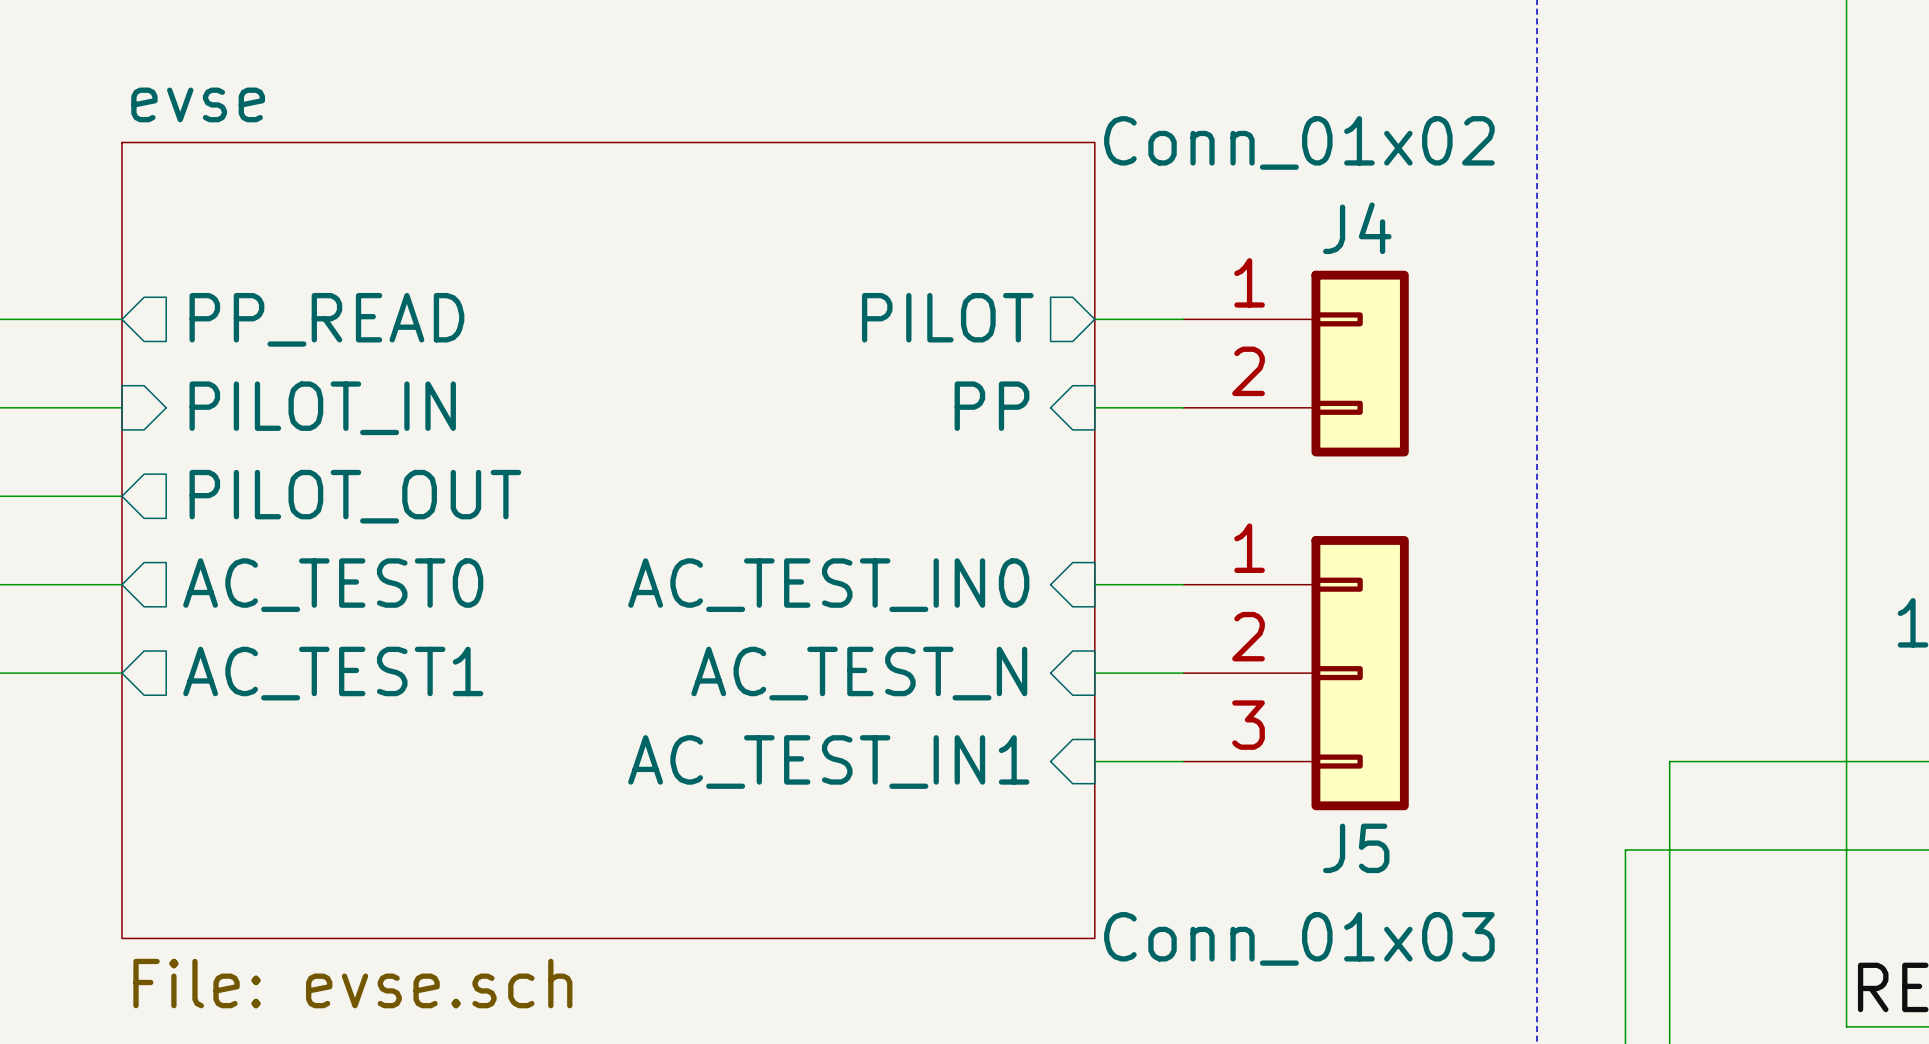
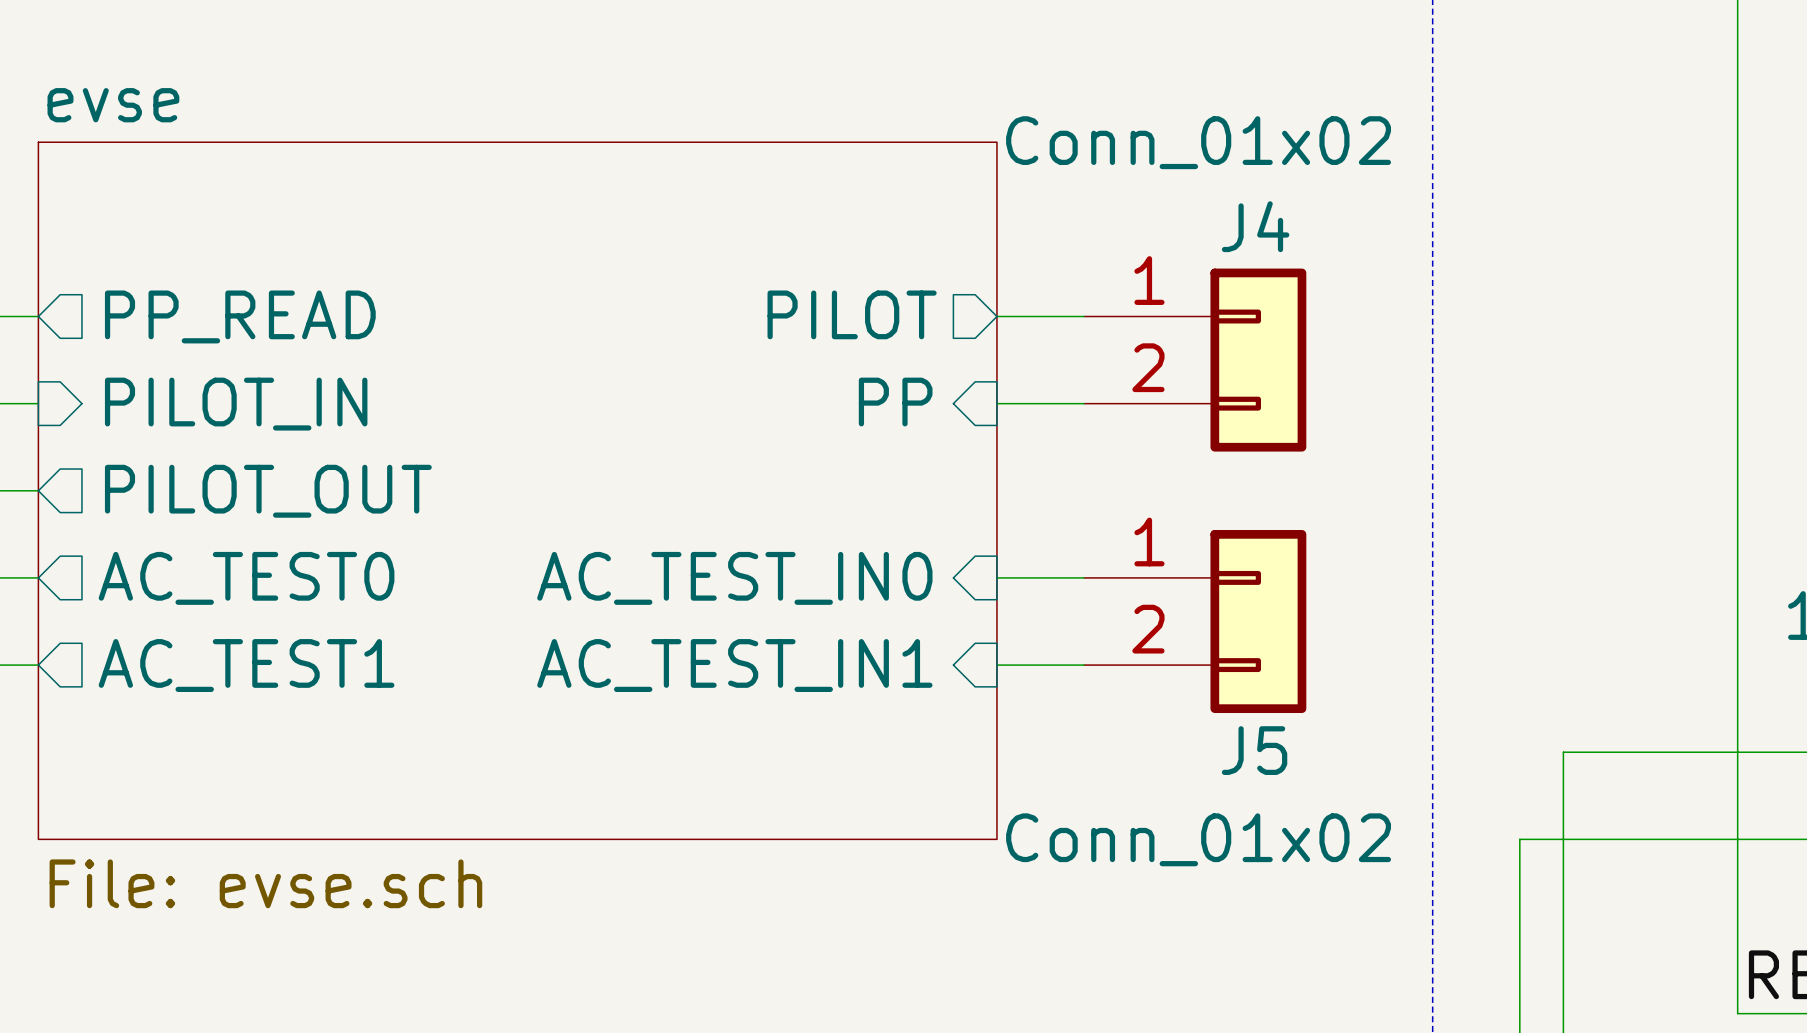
sheet evse: none -> File: evse.sch (517, 490)
J5 symbol: [1183, 536, 1409, 811] -> [1084, 530, 1307, 714]
sheet evse: File: evse.sch (608, 540) -> none
sheet pin: AC_TEST_N (859, 673) -> AC_TEST_IN1 (734, 665)
wire: (1094, 761) (1183, 761) -> none
sheet pin: AC_TEST_IN1 (828, 762) -> none
J5 value: Conn_01x03 (1299, 938) -> Conn_01x02 (1198, 839)

